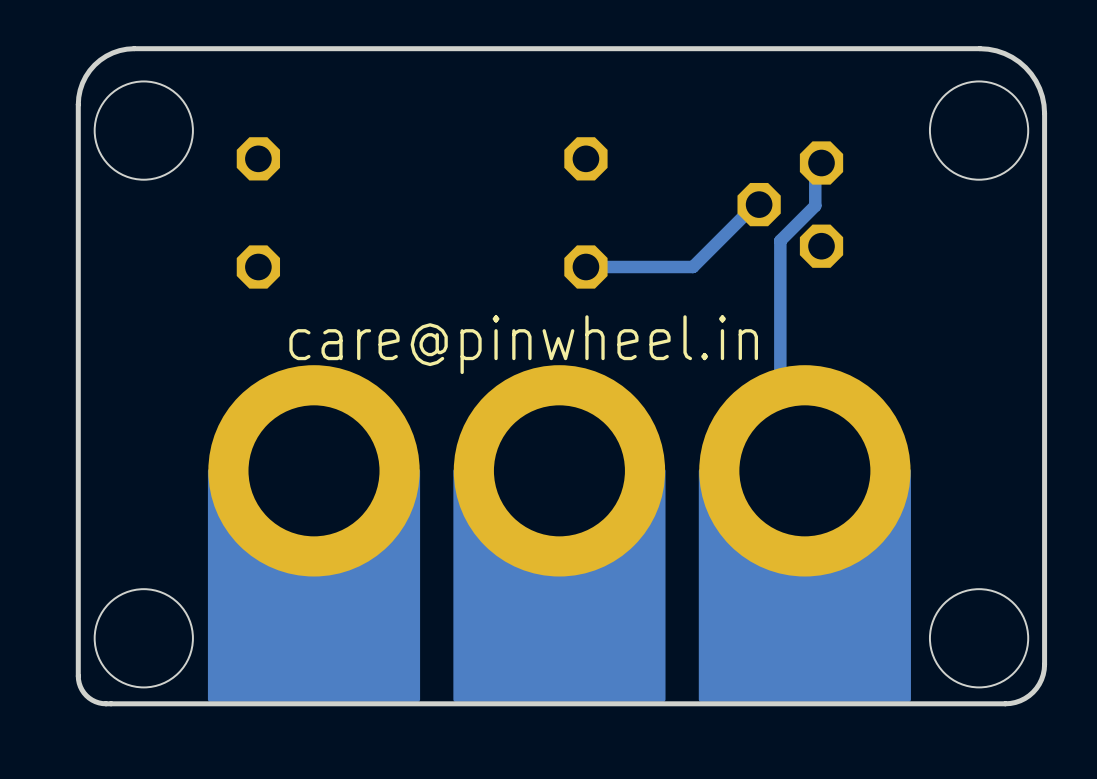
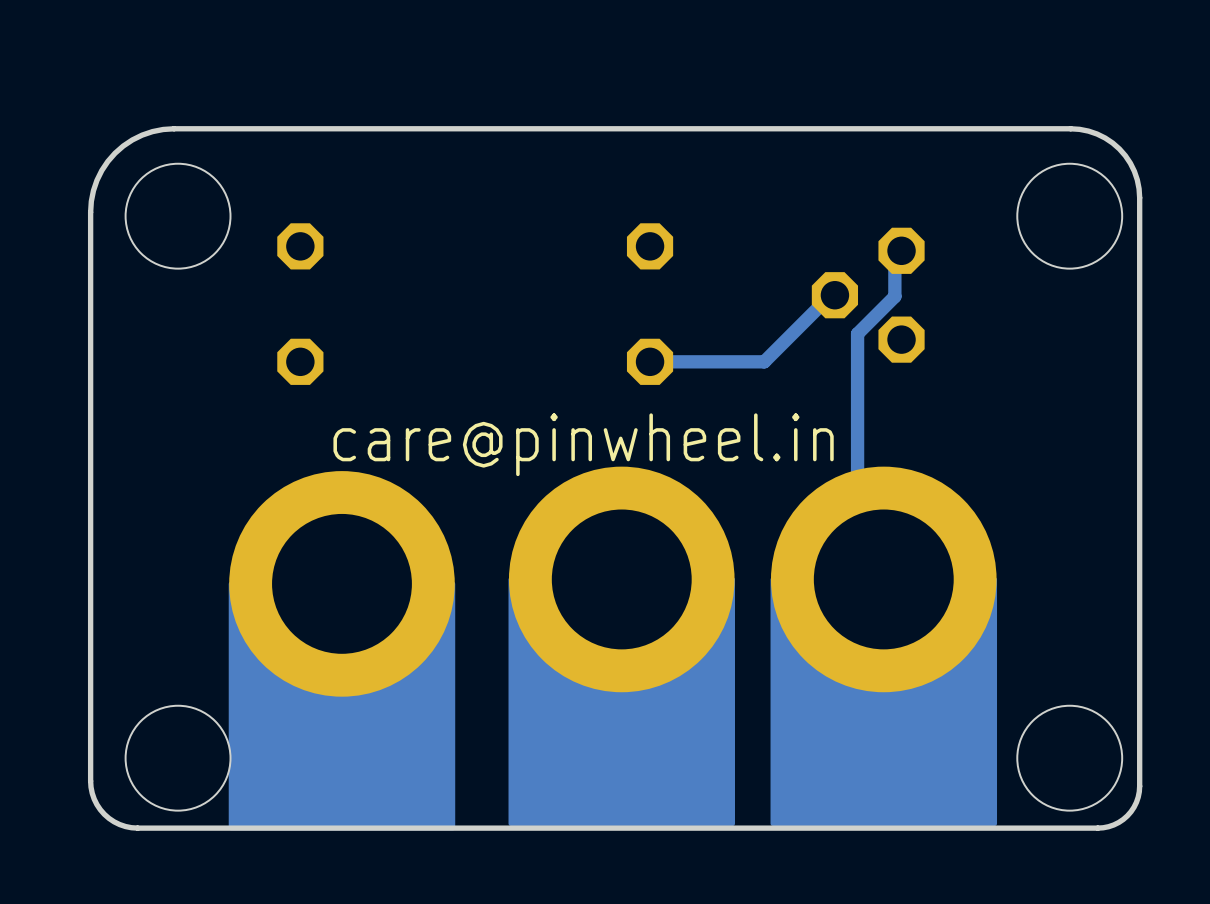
board edge: (140, 48) (126, 49) (112, 52) (94, 65) (82, 83) (78, 104) (78, 676) (80, 686) (86, 695) (95, 701) (105, 703) -> (174, 128) (142, 135) (115, 153) (96, 180) (90, 212) (91, 787) (96, 804) (109, 818) (119, 824) (137, 828)
part position: (314, 533) -> (341, 650)

